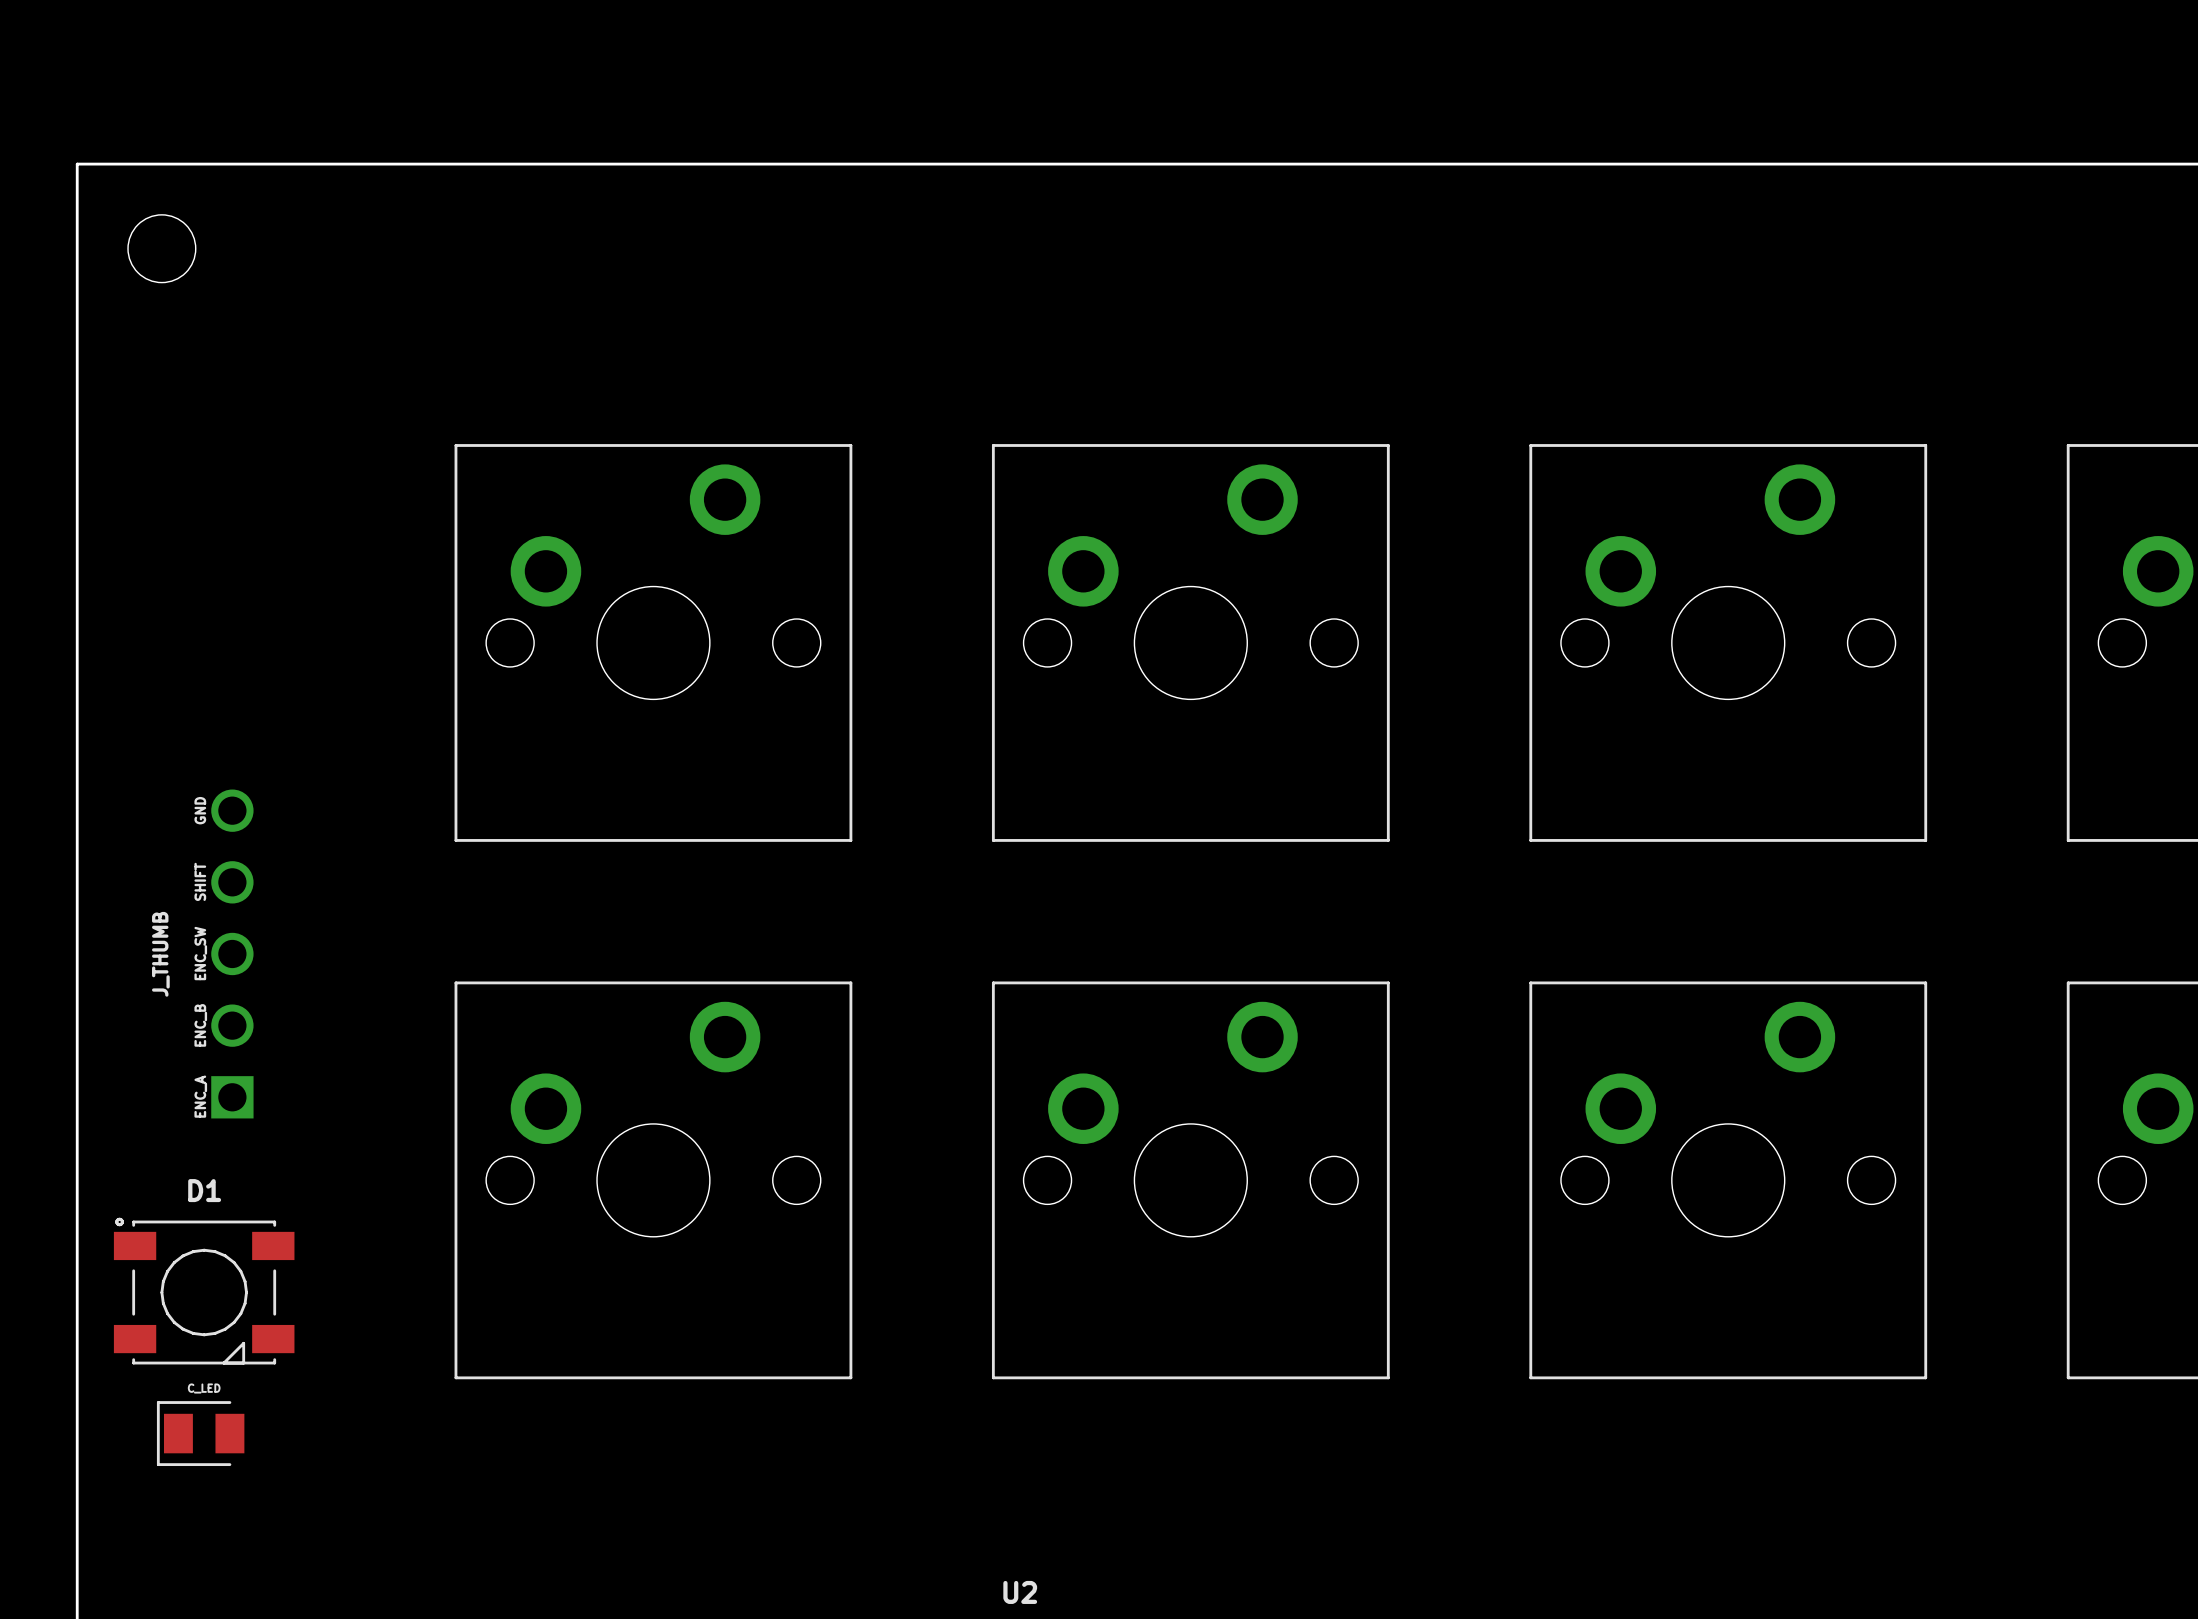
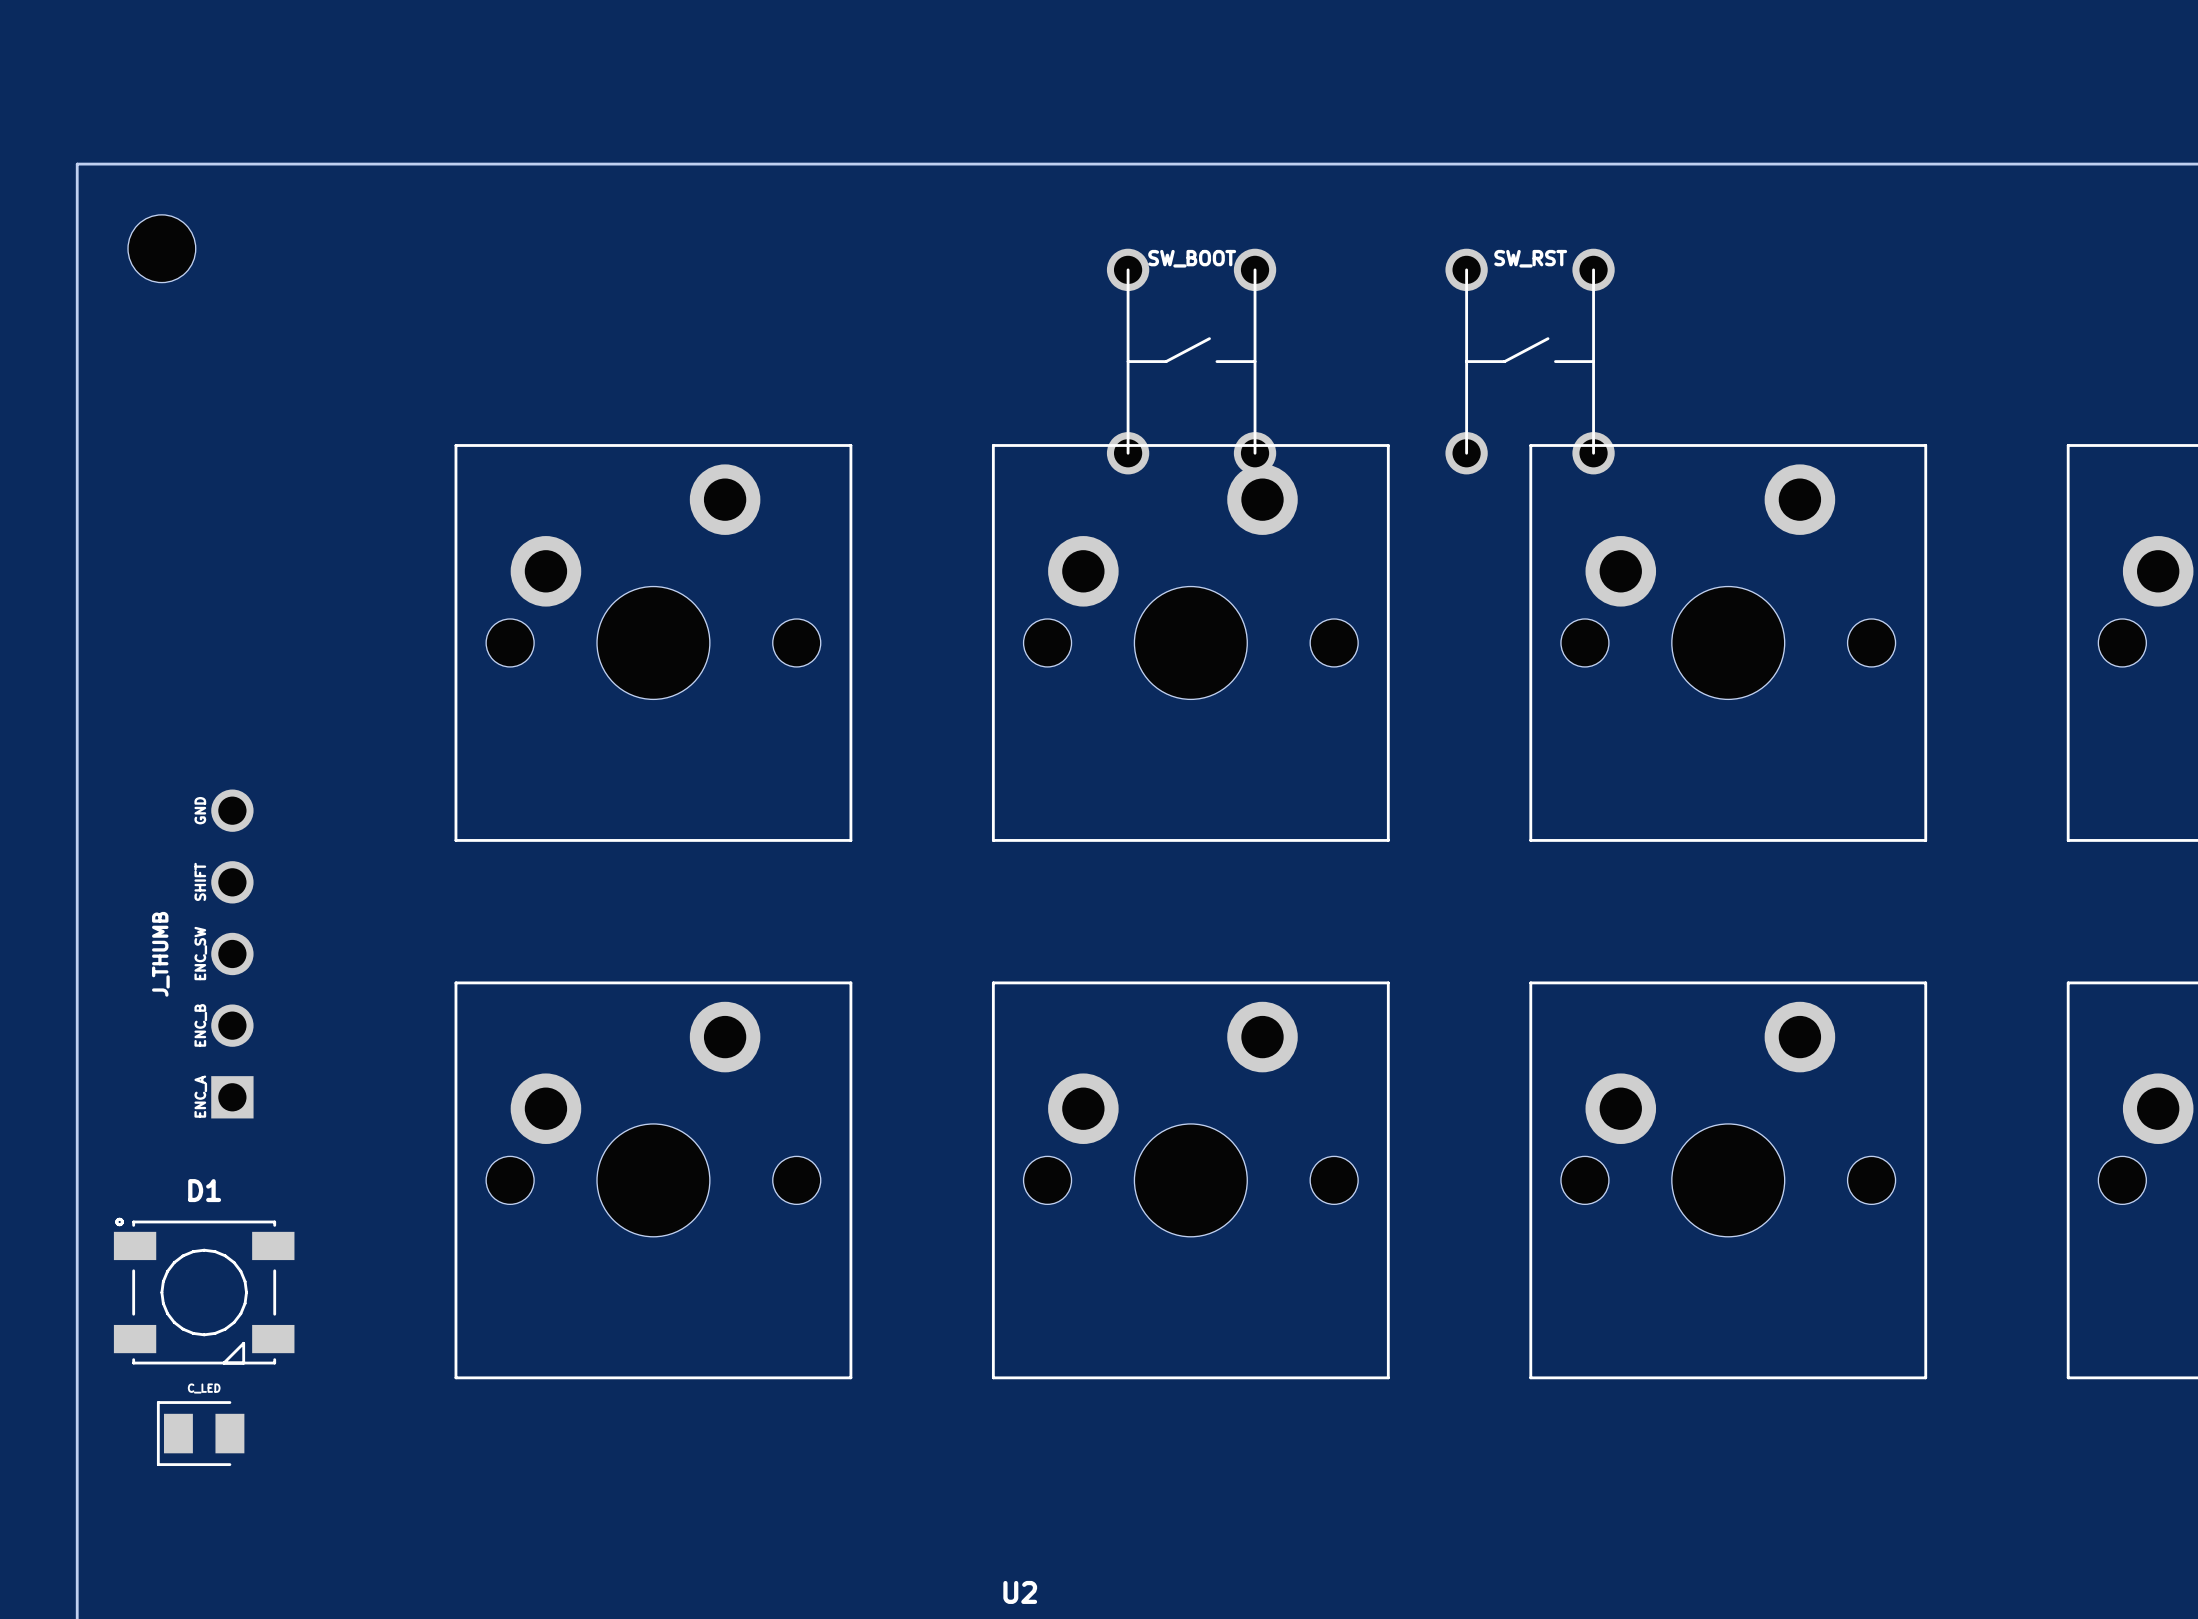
SW_BOOT: none -> (1191, 361)
SW_RST: none -> (1530, 361)

